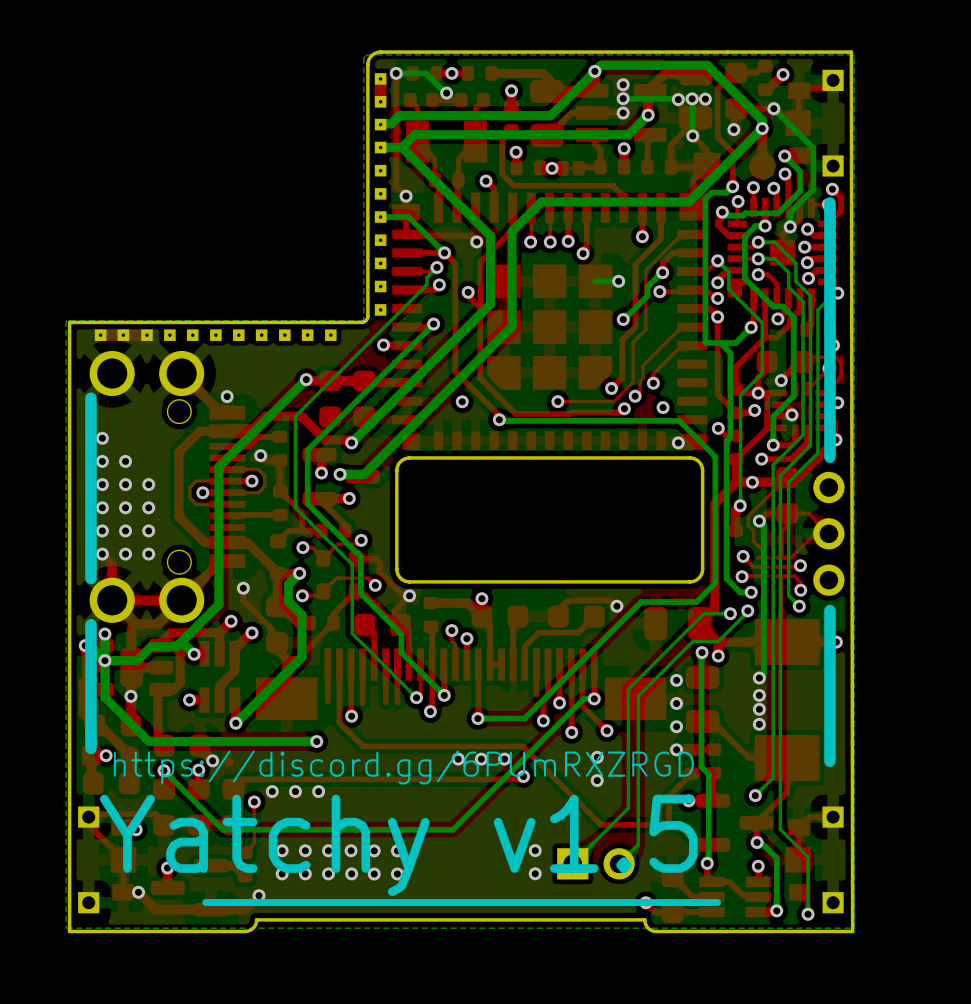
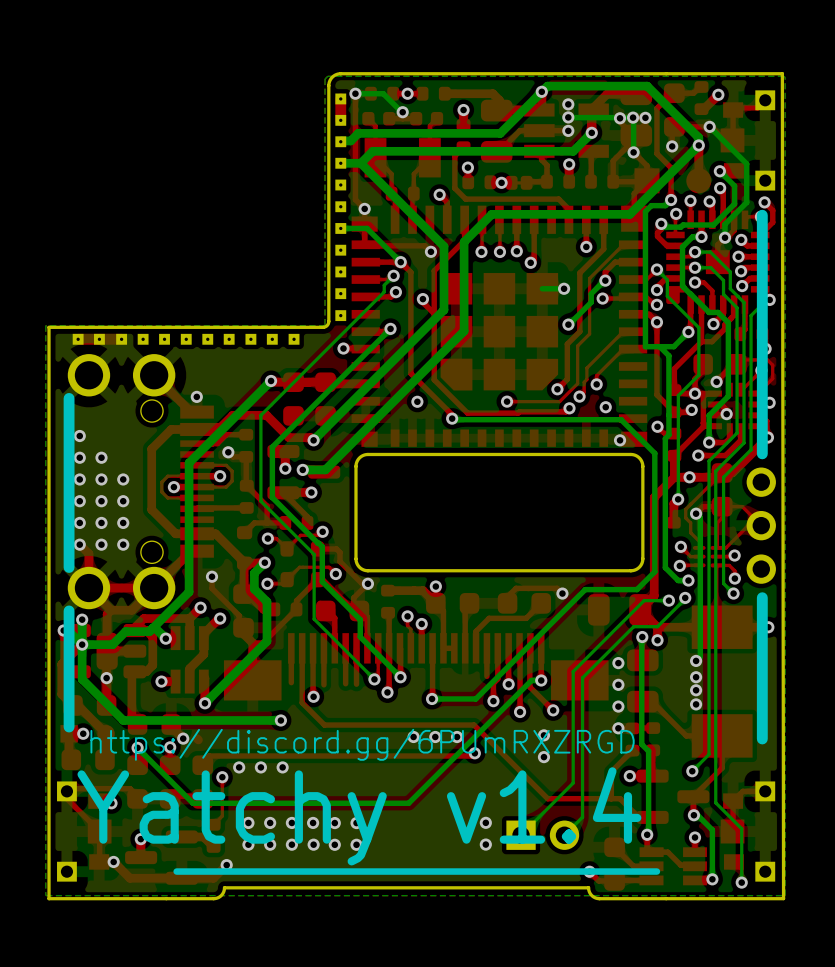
text: Yatchy v1.5 (398, 845) -> Yatchy v1.4 (359, 816)

